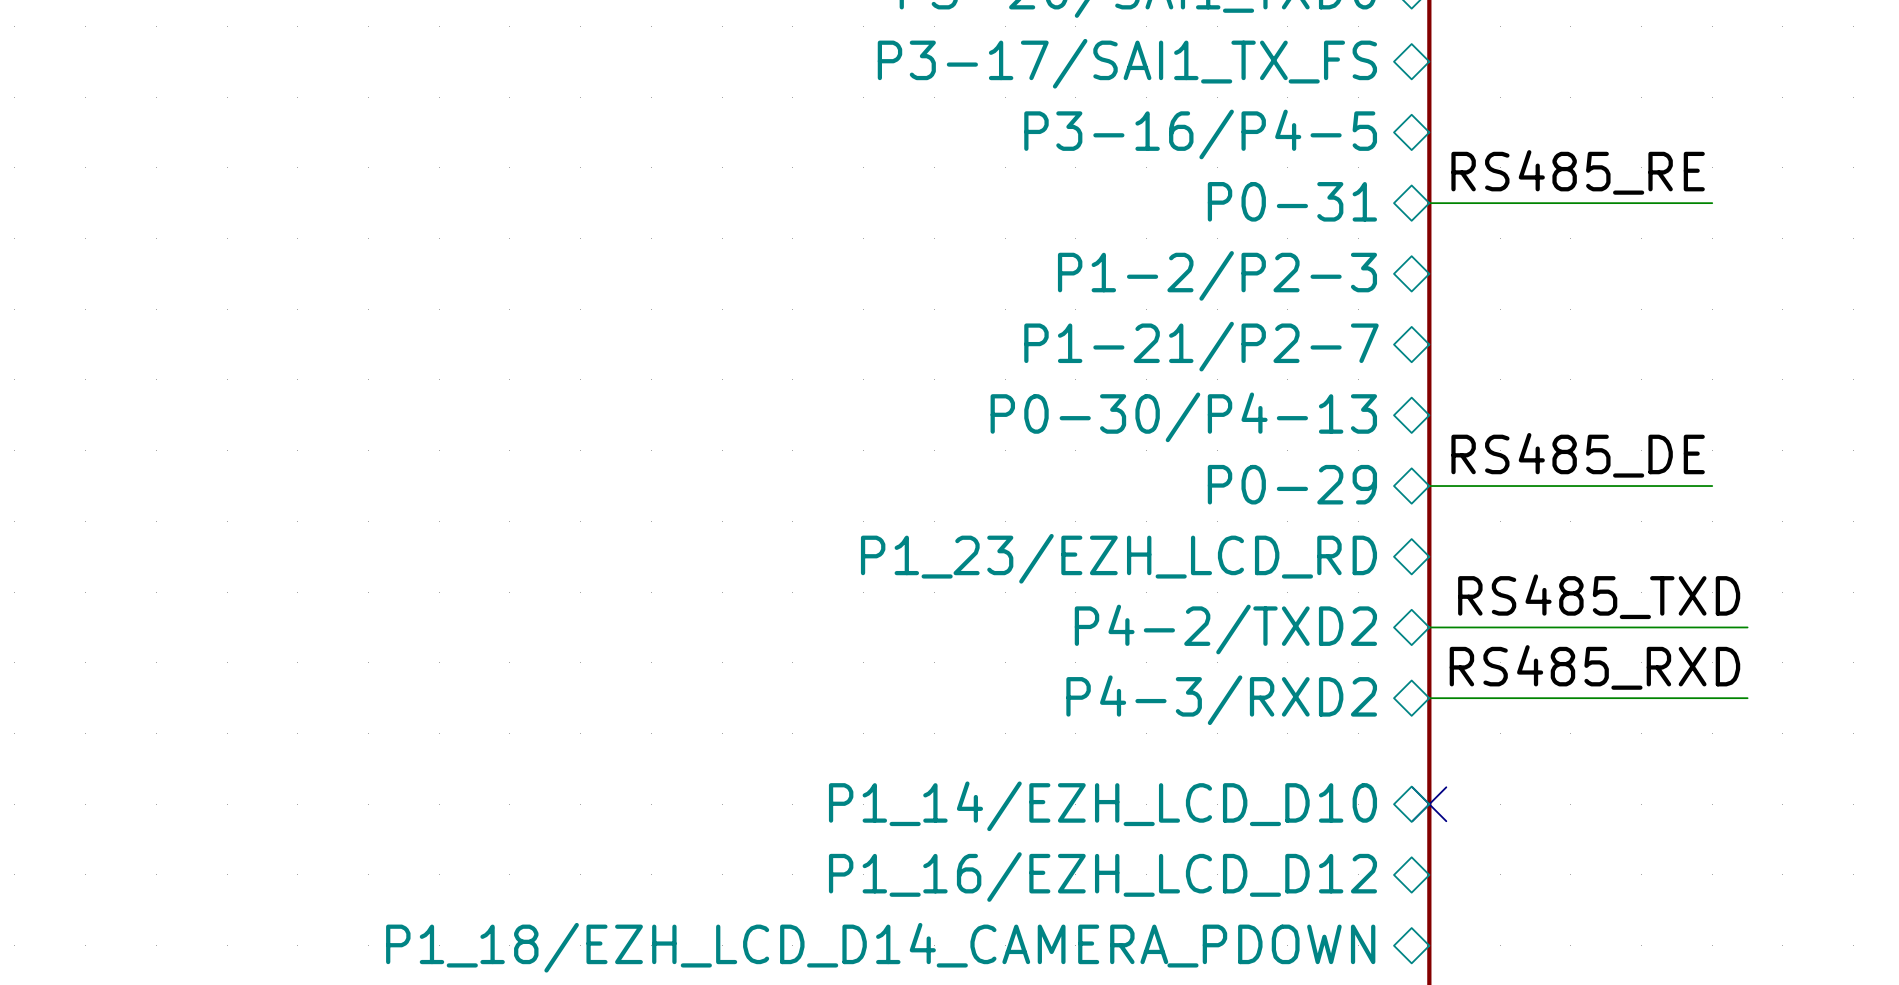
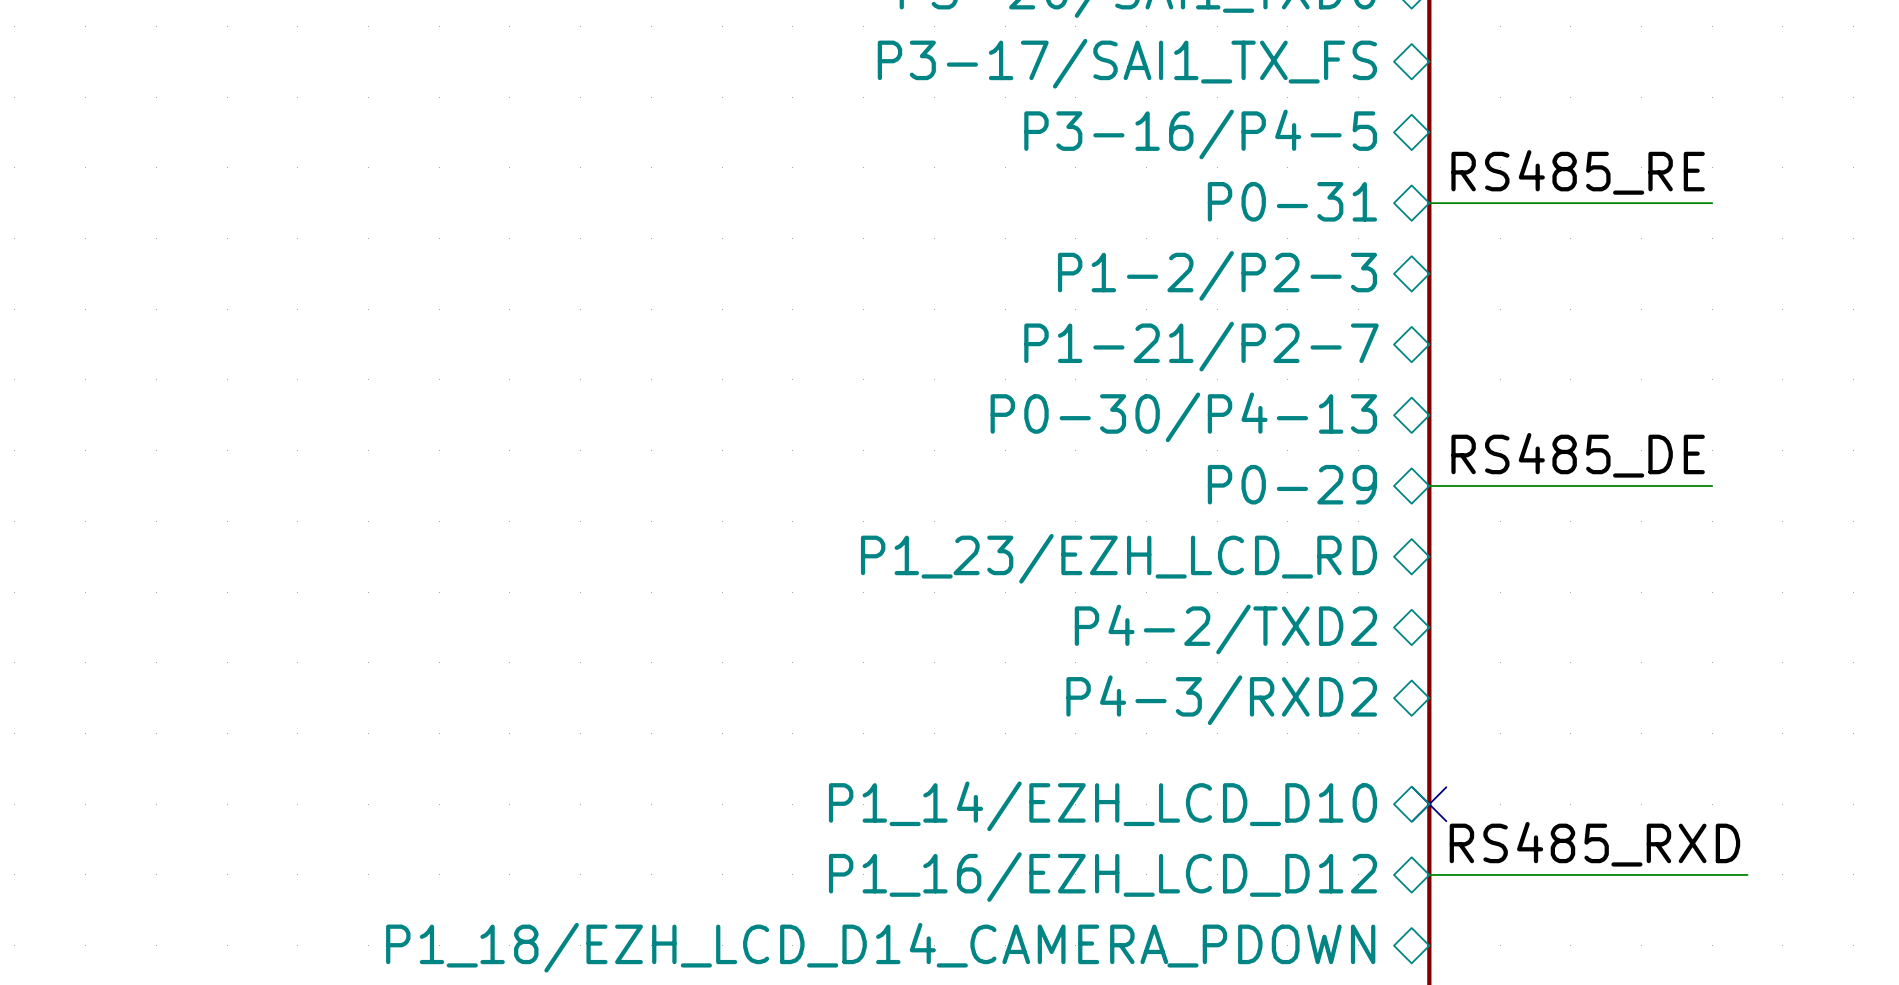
label: RS485_TXD (1599, 596) -> none
wire: (1429, 627) (1747, 627) -> none
label position: RS485_RXD (1594, 667) -> RS485_RXD (1594, 844)
wire: (1429, 698) (1747, 698) -> (1429, 874) (1747, 874)

